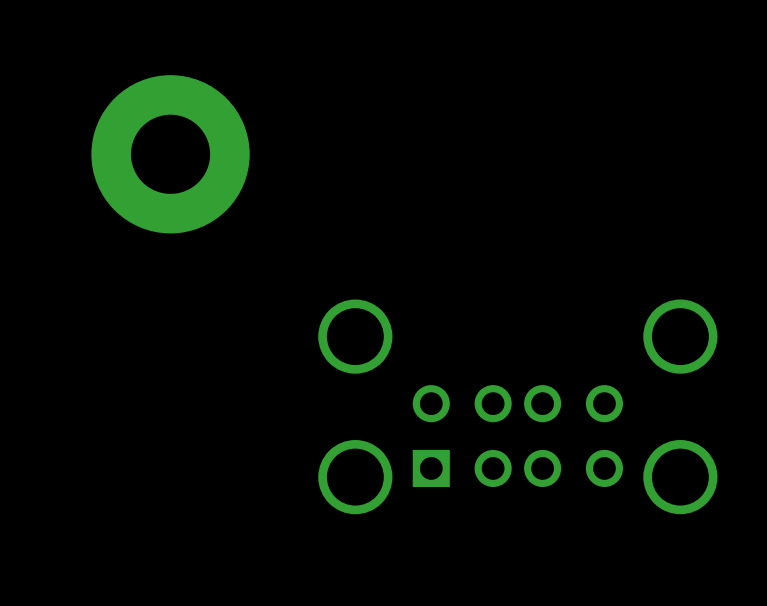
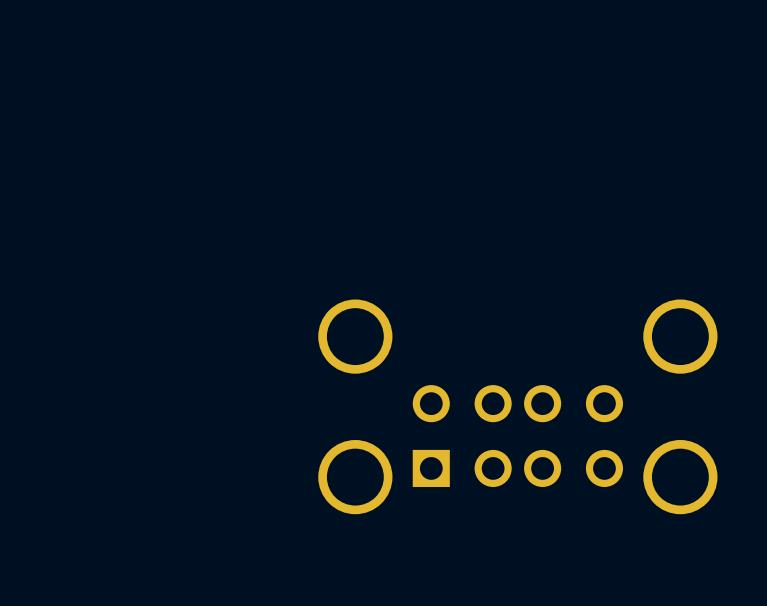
part: (170, 154) -> none

